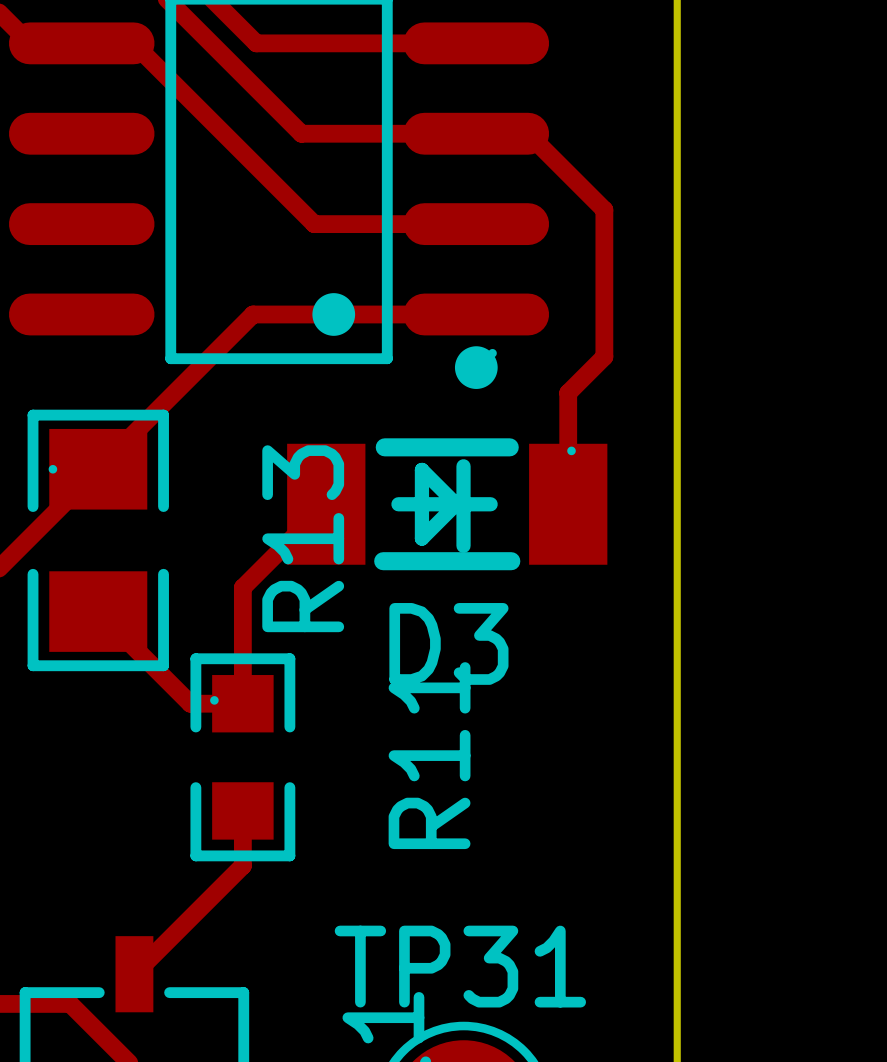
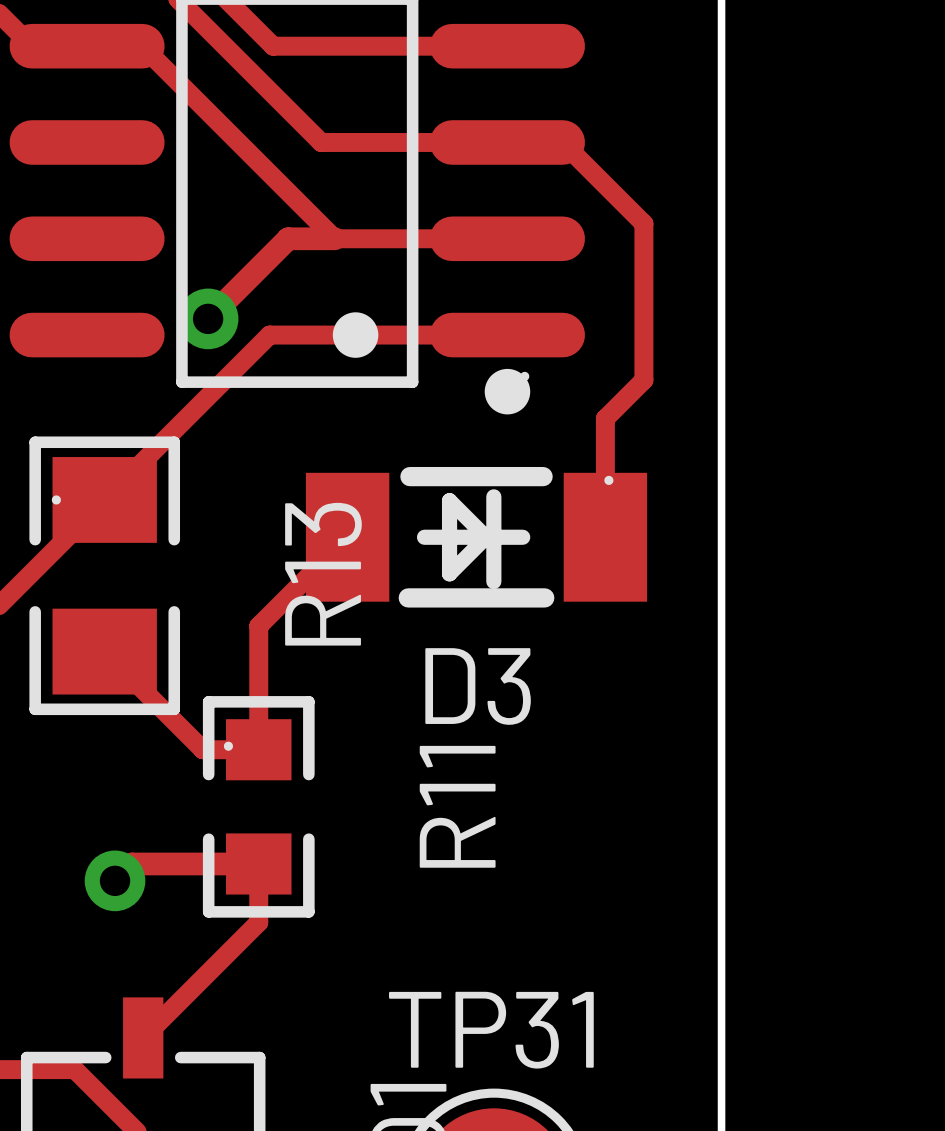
track: none -> (334, 238) (288, 238) (208, 318)
via: none -> (208, 318)
track: none -> (258, 863) (131, 863) (115, 880)
via: none -> (115, 880)

